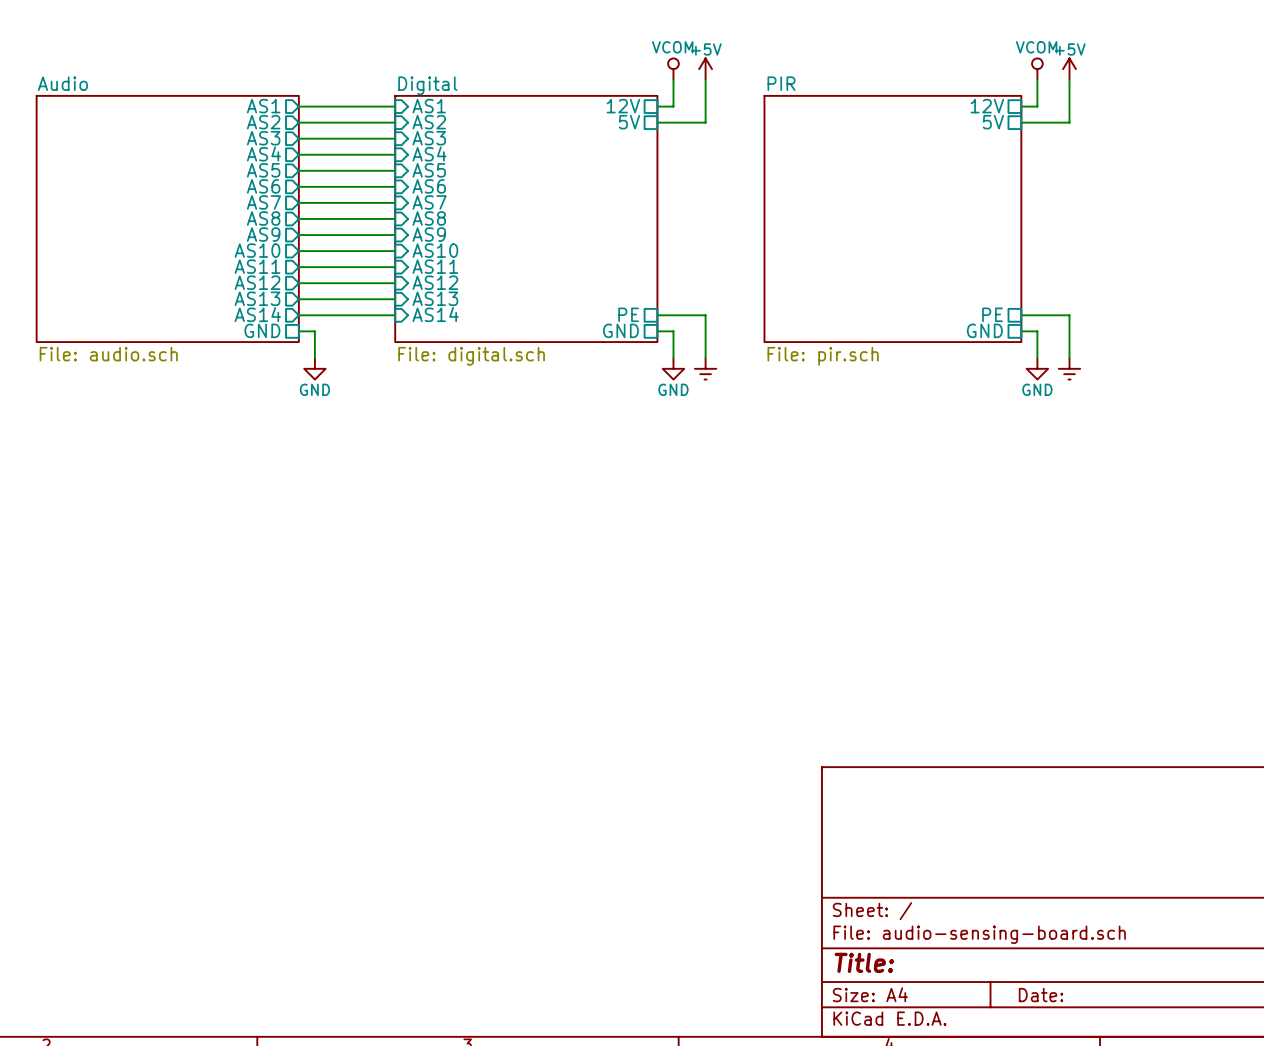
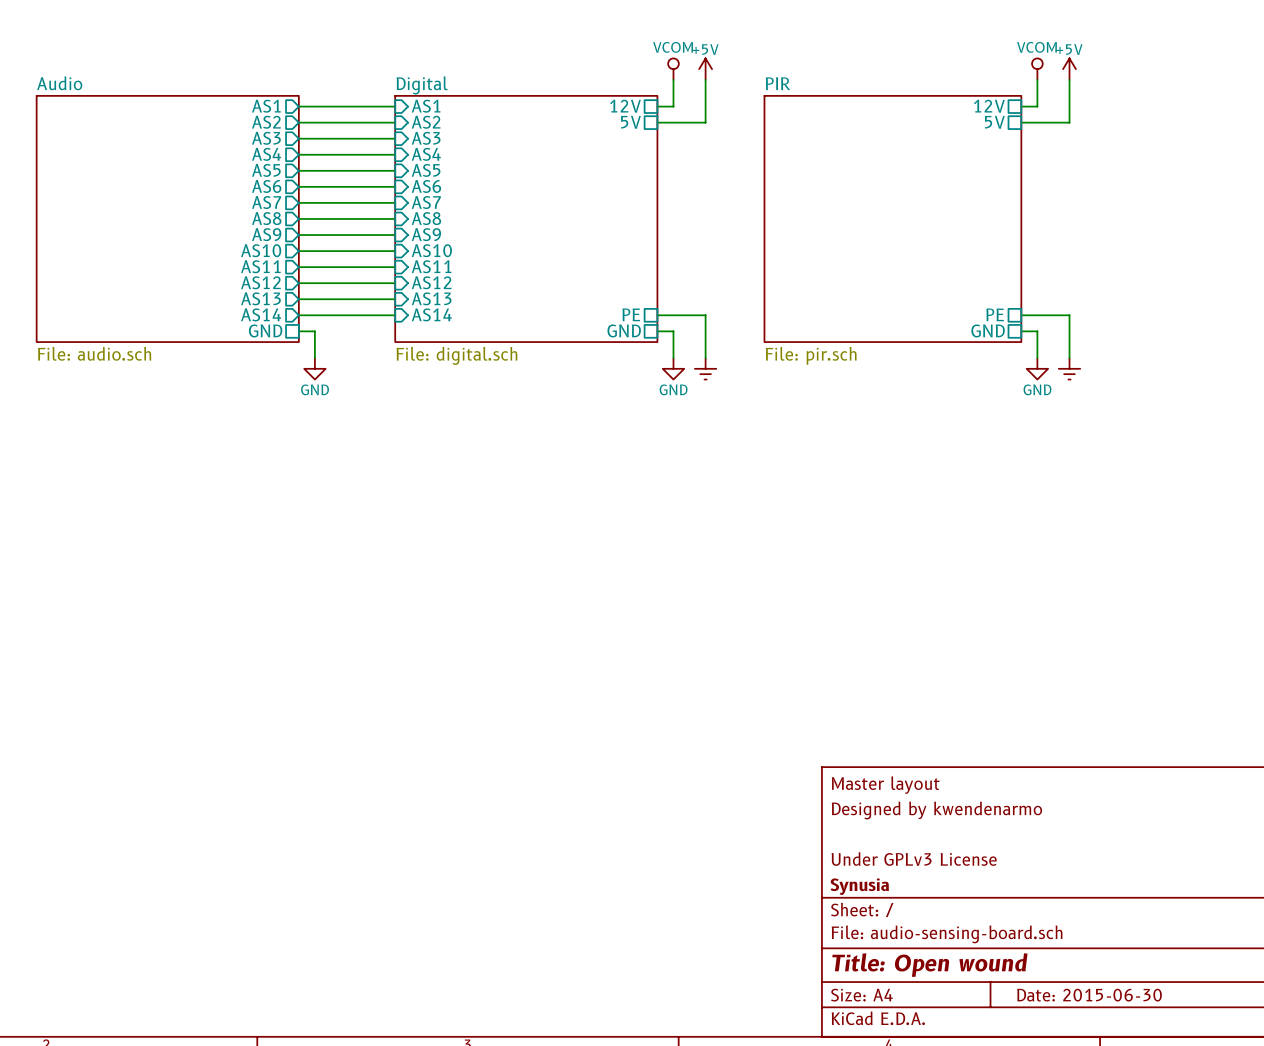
title block: none -> Master layout (885, 785)
title block: none -> Designed by kwendenarmo (936, 810)
title block: none -> Under GPLv3 License (914, 859)
title block: none -> Synusia (859, 886)
title block: Title: (864, 962) -> Title: Open wound (929, 965)
title block: Date: (1041, 995) -> Date: 2015-06-30 (1089, 995)

